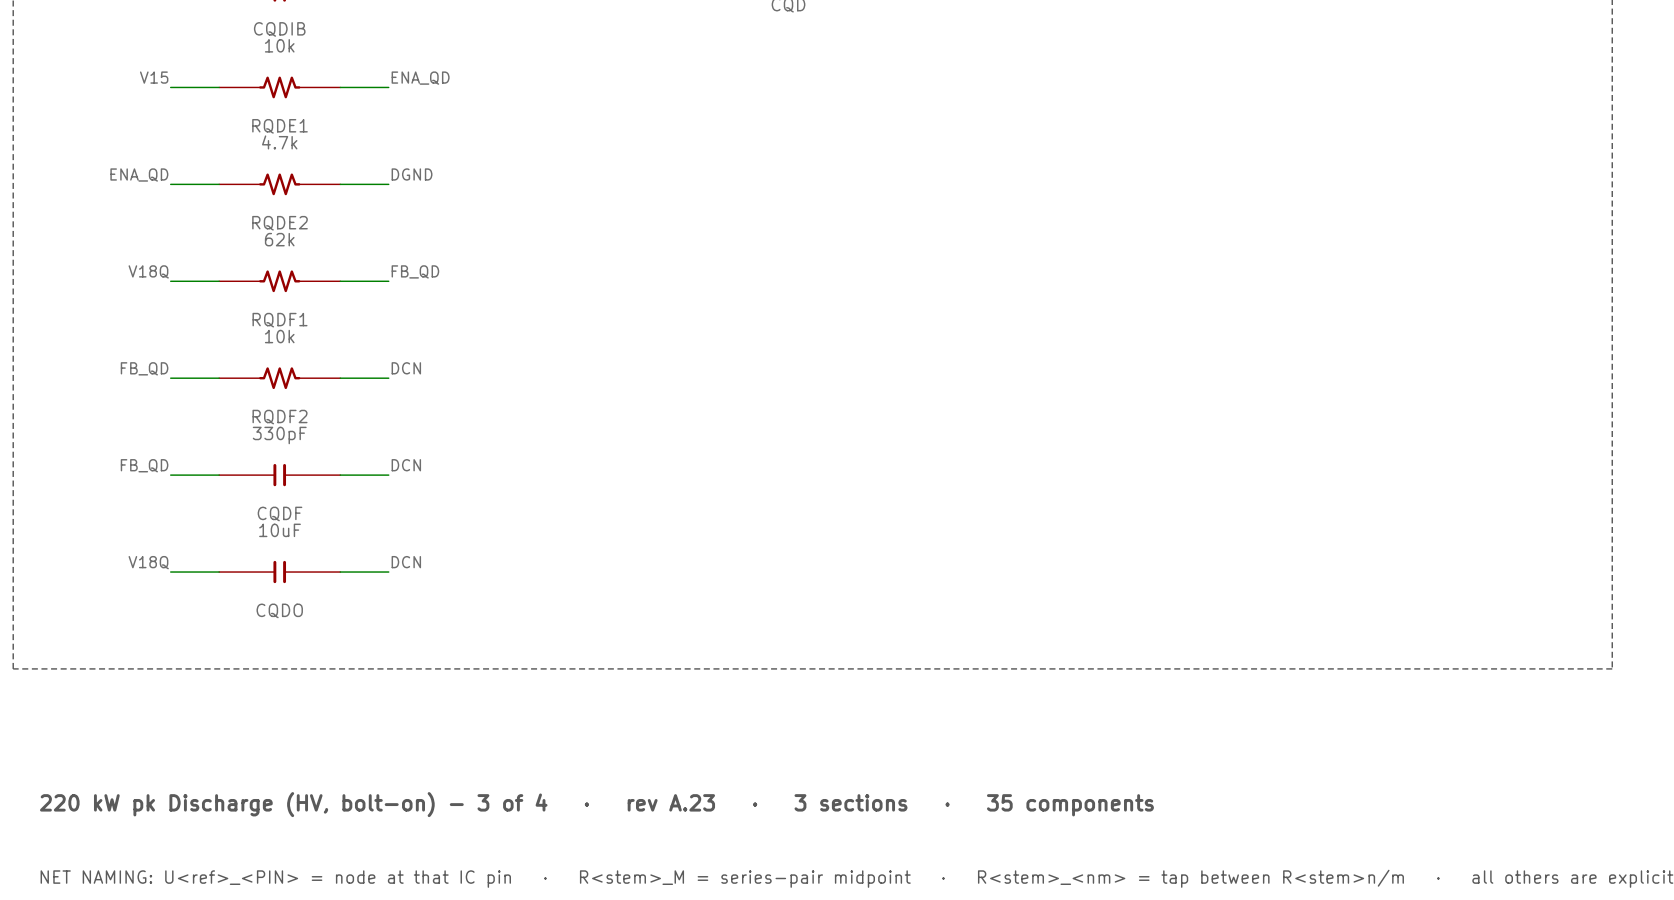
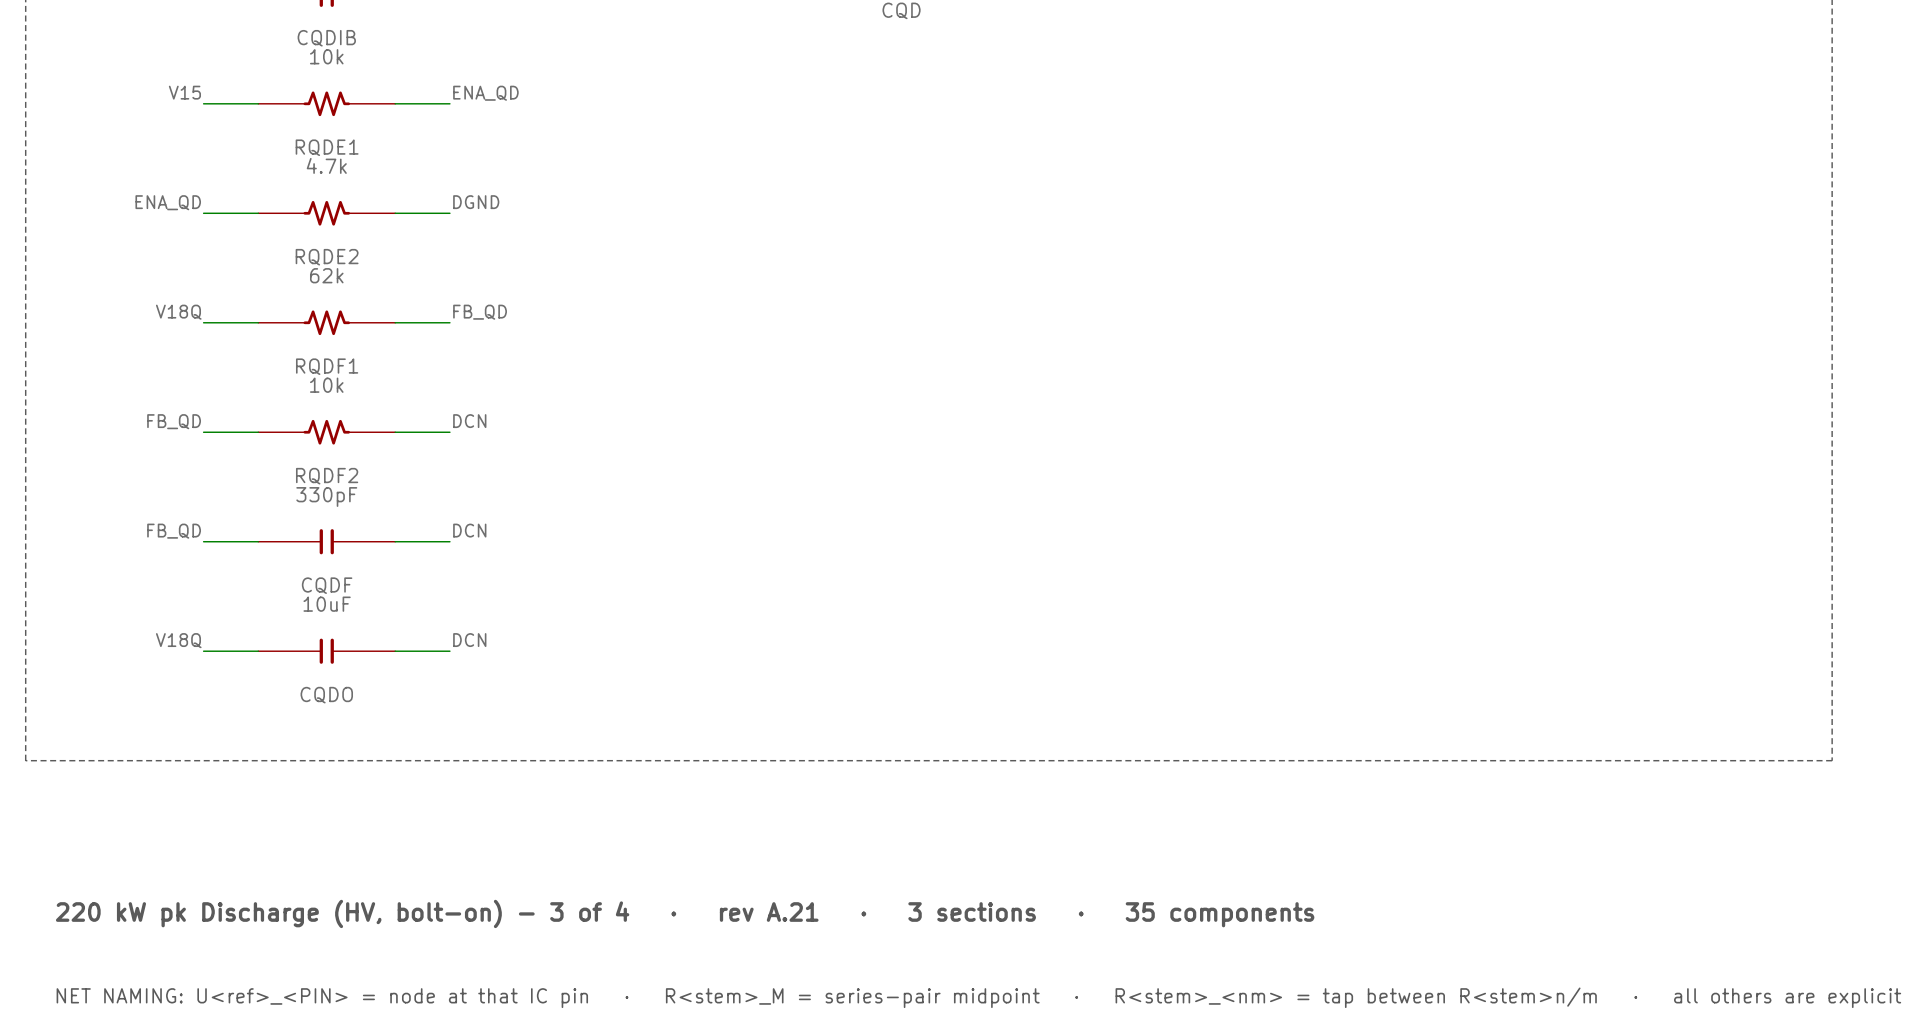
text: 220 kW pk Discharge (HV, bolt-on) - 3 of 4 · rev A.23 · 3 sections · 35 components (596, 804) -> 220 kW pk Discharge (HV, bolt-on) - 3 of 4 · rev A.21 · 3 sections · 35 components (685, 913)

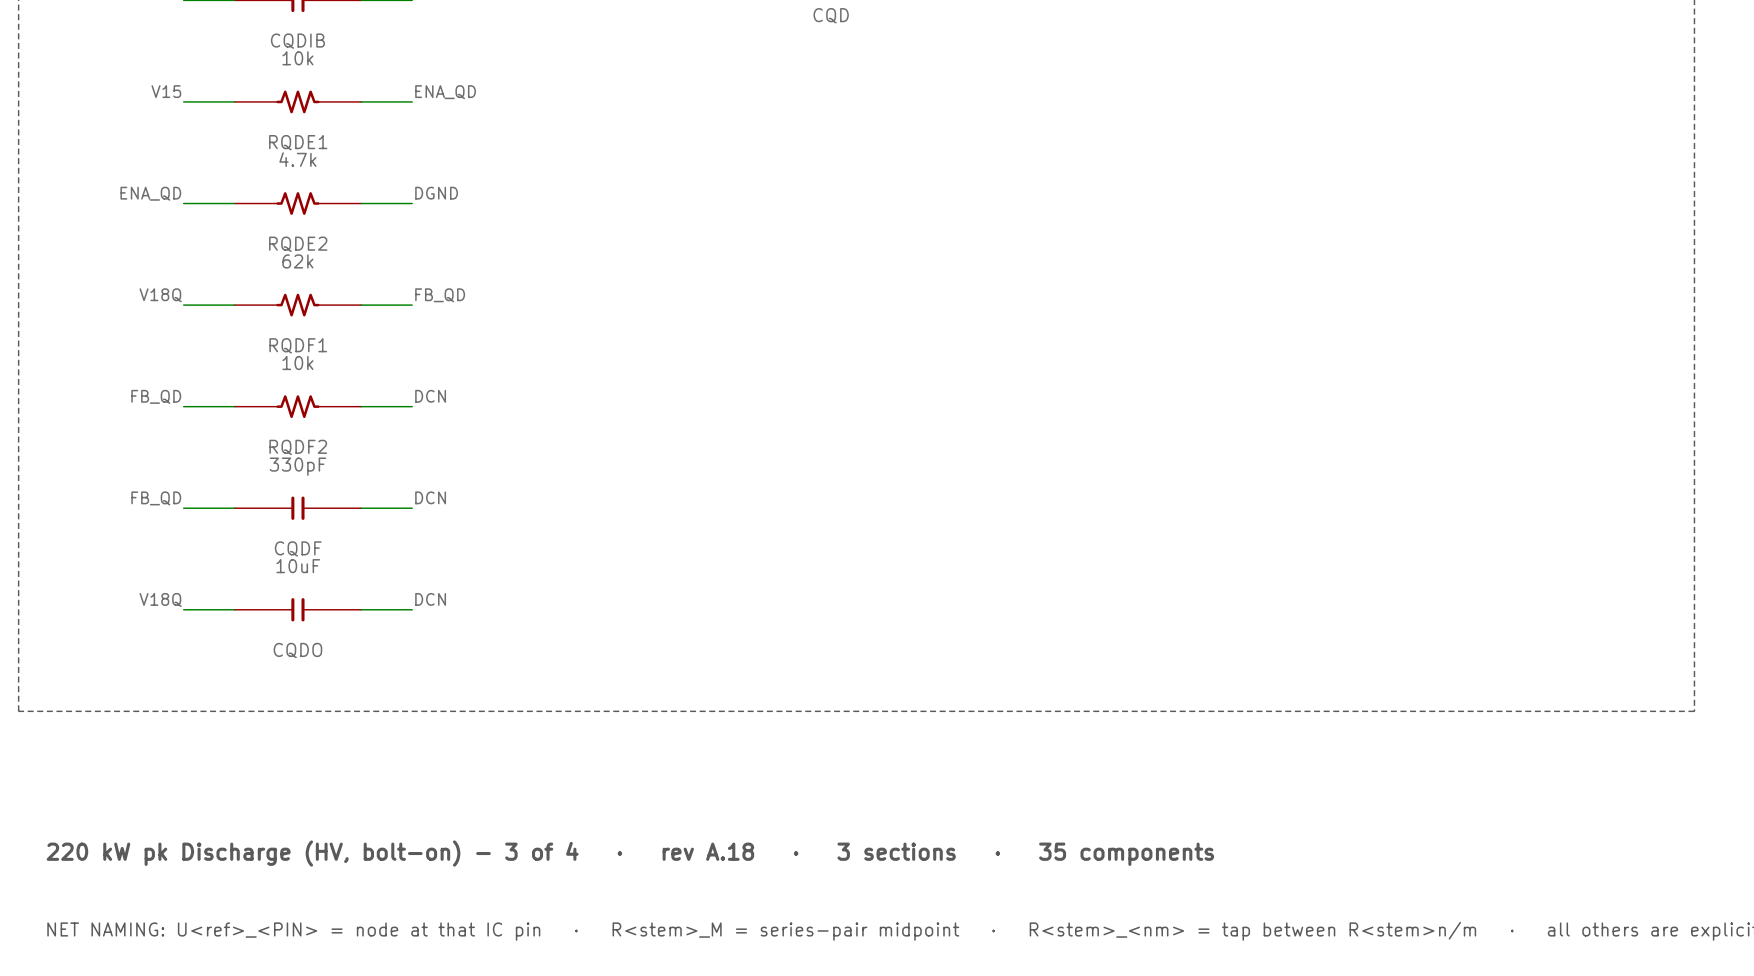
text: 220 kW pk Discharge (HV, bolt-on) - 3 of 4 · rev A.21 · 3 sections · 35 components (685, 913) -> 220 kW pk Discharge (HV, bolt-on) - 3 of 4 · rev A.18 · 3 sections · 35 components (630, 853)

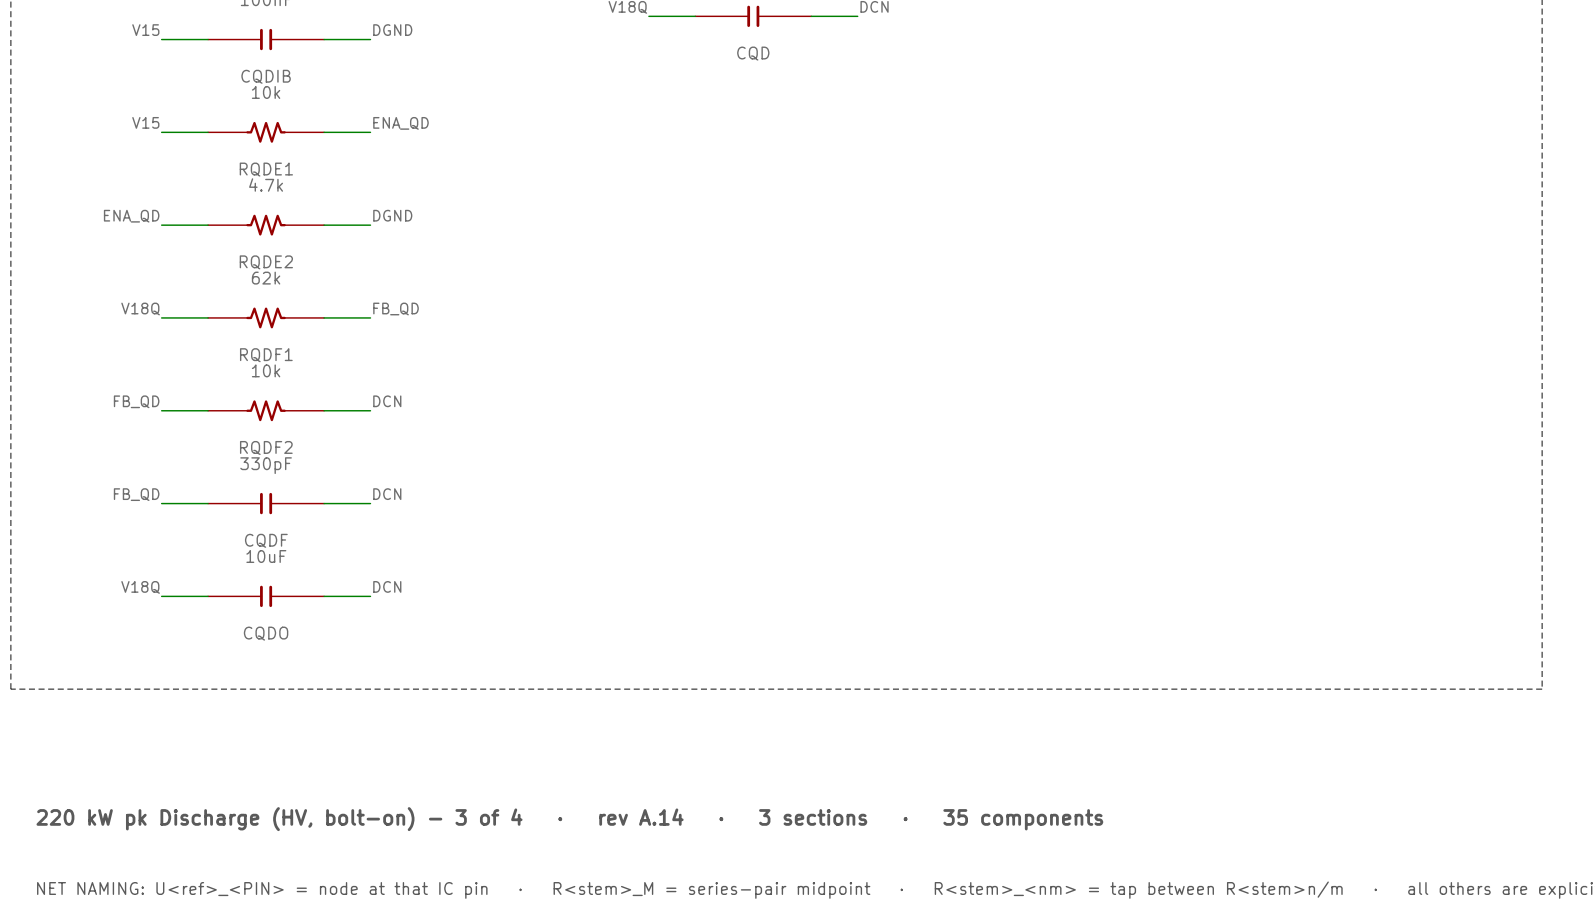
text: 220 kW pk Discharge (HV, bolt-on) - 3 of 4 · rev A.18 · 3 sections · 35 components (630, 853) -> 220 kW pk Discharge (HV, bolt-on) - 3 of 4 · rev A.14 · 3 sections · 35 components (569, 819)

